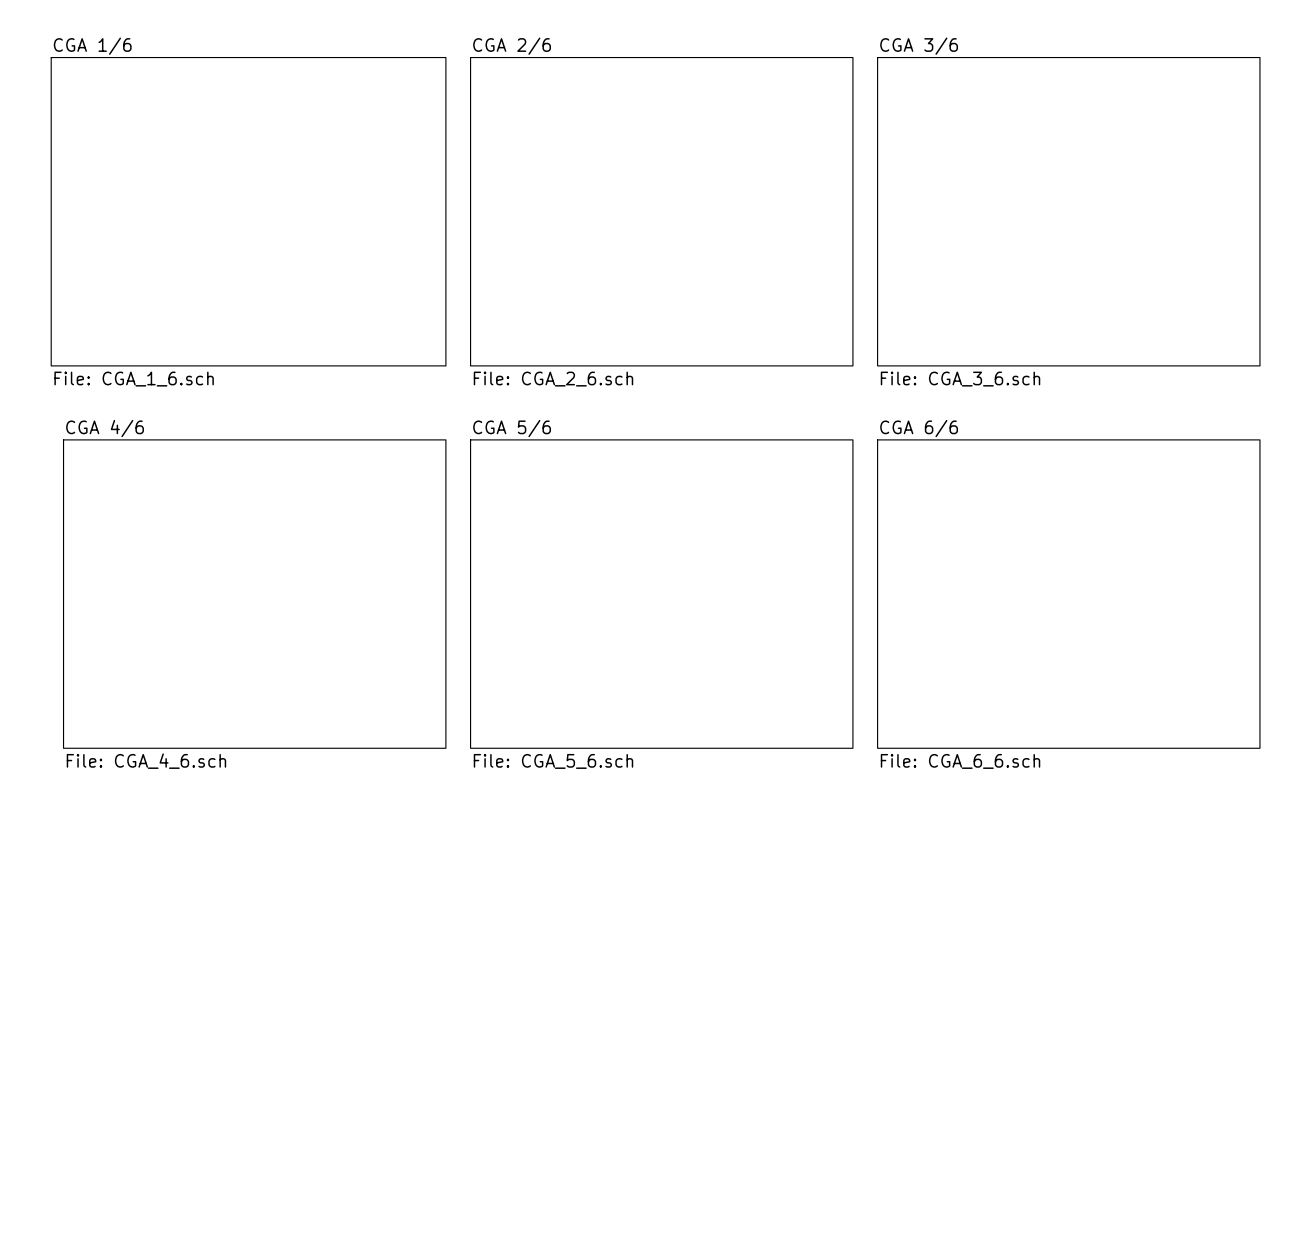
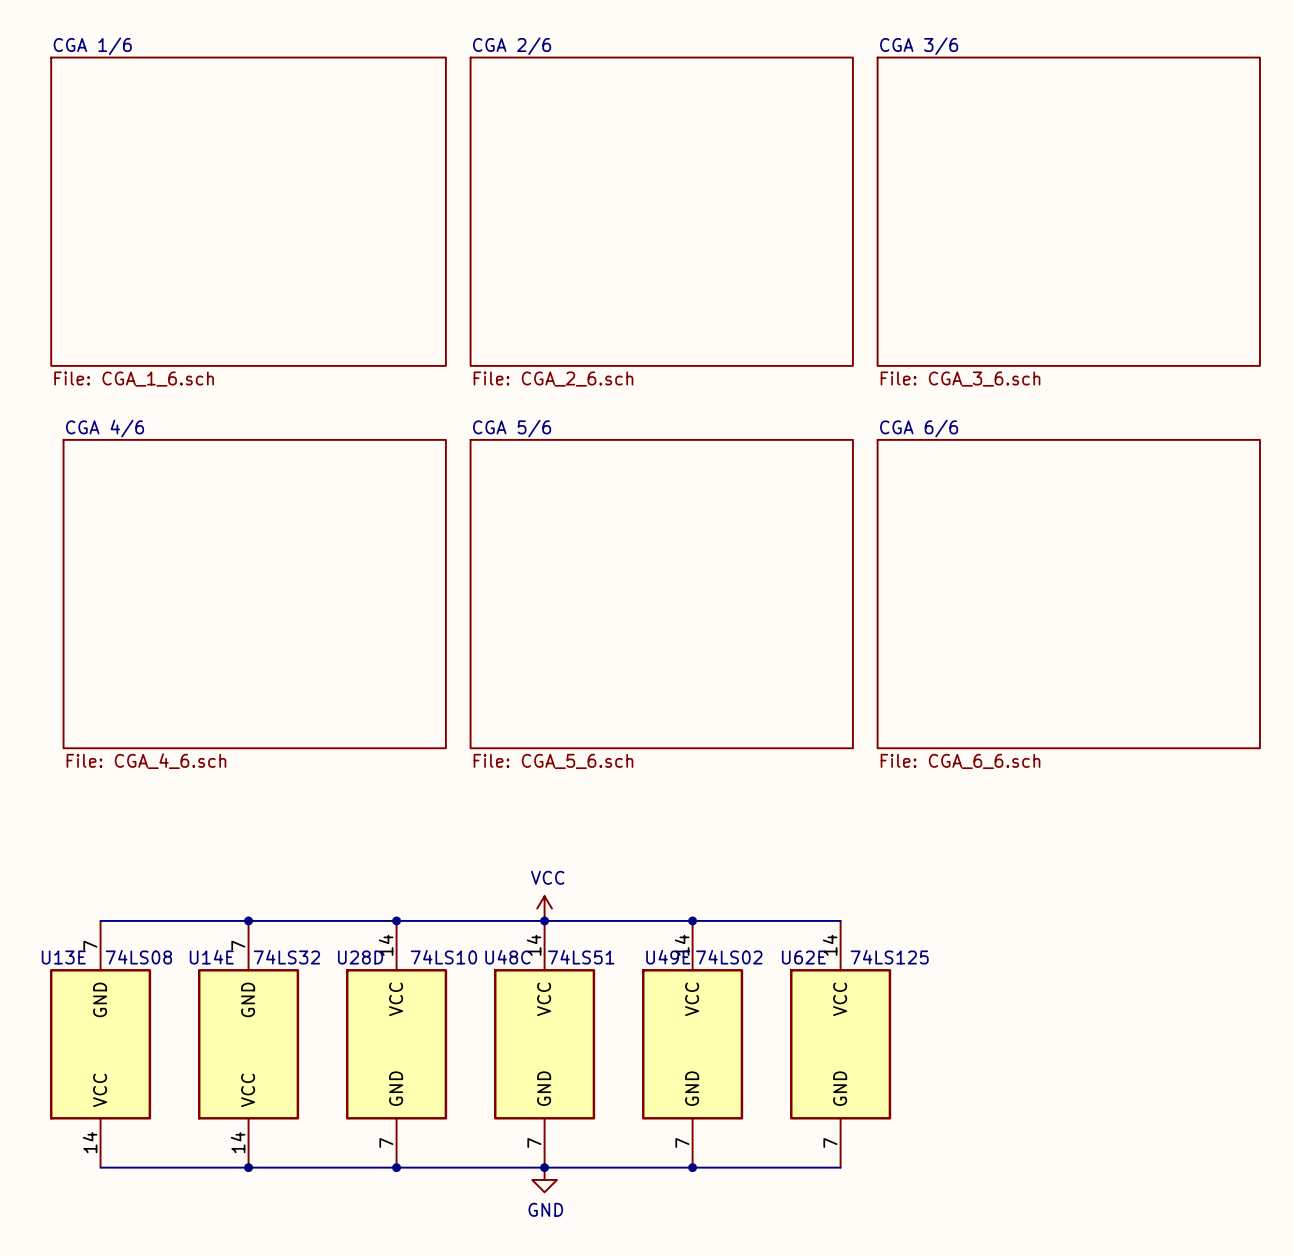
power symbol: none -> VCC (544, 908)
wire: none -> (100, 920) (840, 920)
junction: none -> (248, 920)
junction: none -> (396, 920)
junction: none -> (544, 920)
junction: none -> (692, 920)
U13E: none -> 74LS08 (100, 1044)
U14E: none -> 74LS32 (248, 1044)
U28D: none -> 74LS10 (396, 1044)
U48C: none -> 74LS51 (544, 1044)
U49E: none -> 74LS02 (692, 1044)
U62E: none -> 74LS125 (840, 1044)
wire: none -> (100, 1167) (840, 1167)
junction: none -> (248, 1167)
junction: none -> (396, 1167)
junction: none -> (544, 1167)
junction: none -> (692, 1167)
power symbol: none -> GND (544, 1179)

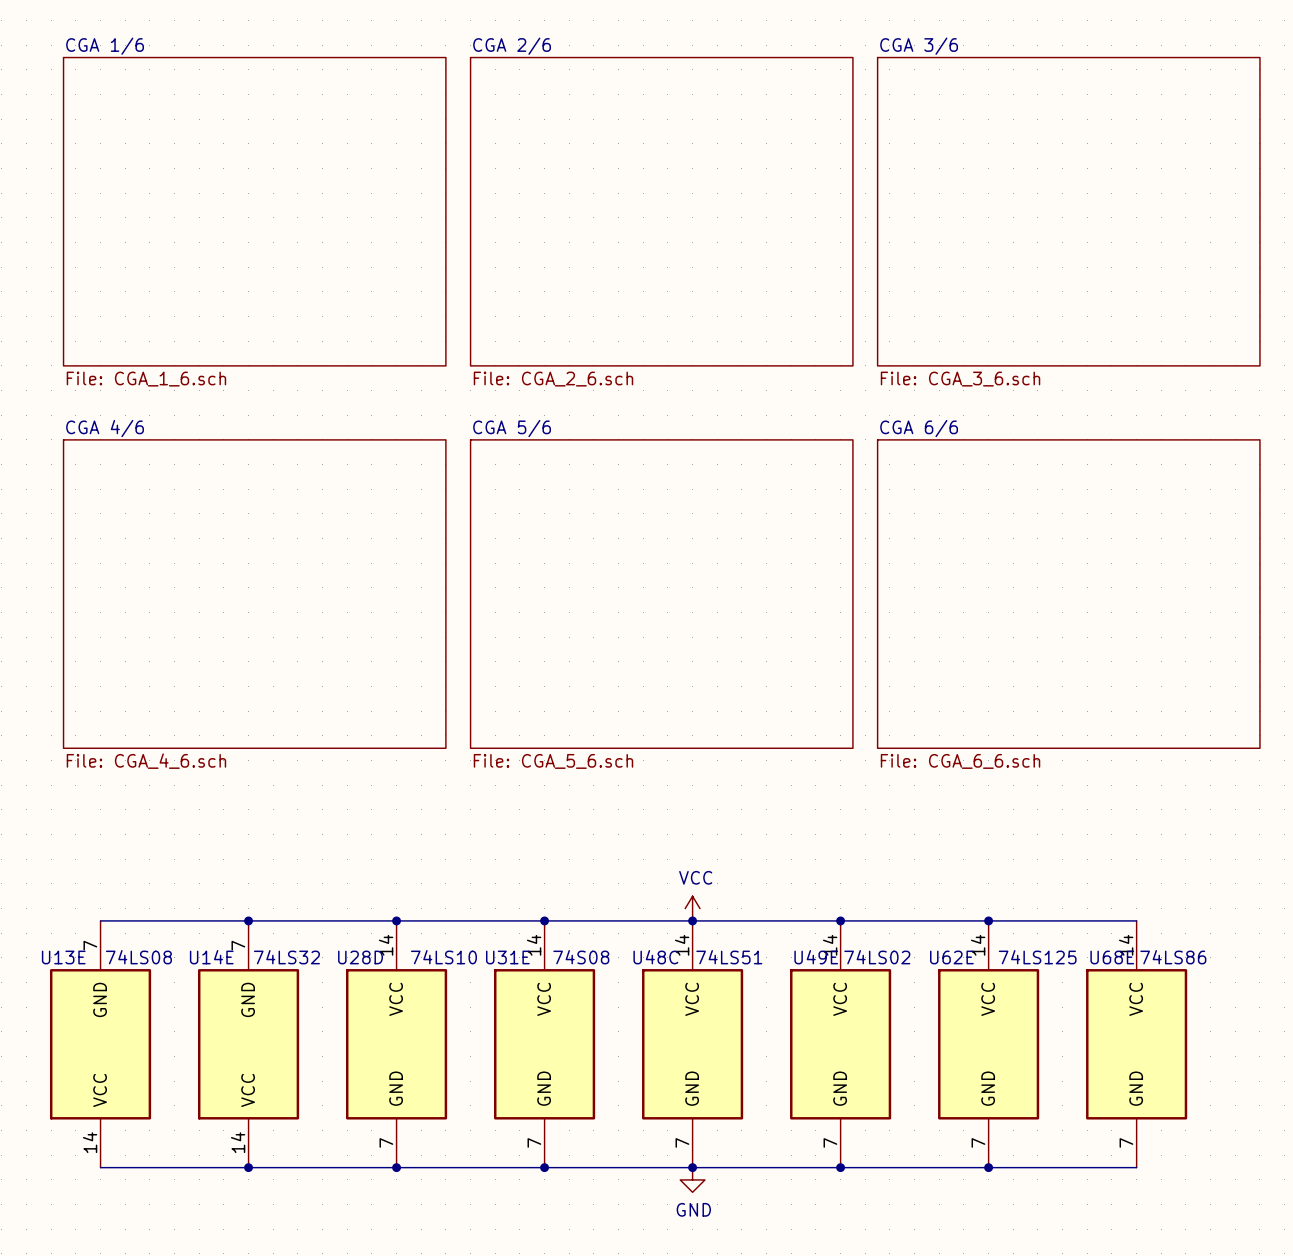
sheet CGA 1/6 shape: [51, 57, 446, 366] -> [63, 57, 446, 366]
power symbol position: VCC (544, 908) -> VCC (692, 908)
wire: none -> (840, 920) (1136, 920)
junction: none -> (840, 920)
junction: none -> (988, 920)
U48C name: U48C (507, 957) -> U31E (507, 957)
U48C value: 74LS51 (581, 957) -> 74S08 (581, 957)
U49E name: U49E (668, 957) -> U48C (655, 957)
U49E value: 74LS02 (729, 957) -> 74LS51 (729, 957)
U62E name: U62E (803, 957) -> U49E (816, 957)
U62E value: 74LS125 (889, 957) -> 74LS02 (877, 957)
U62E: none -> 74LS125 (988, 1044)
U68E: none -> 74LS86 (1136, 1044)
wire: none -> (840, 1167) (1136, 1167)
junction: none -> (840, 1167)
junction: none -> (988, 1167)
power symbol position: GND (544, 1179) -> GND (692, 1179)

